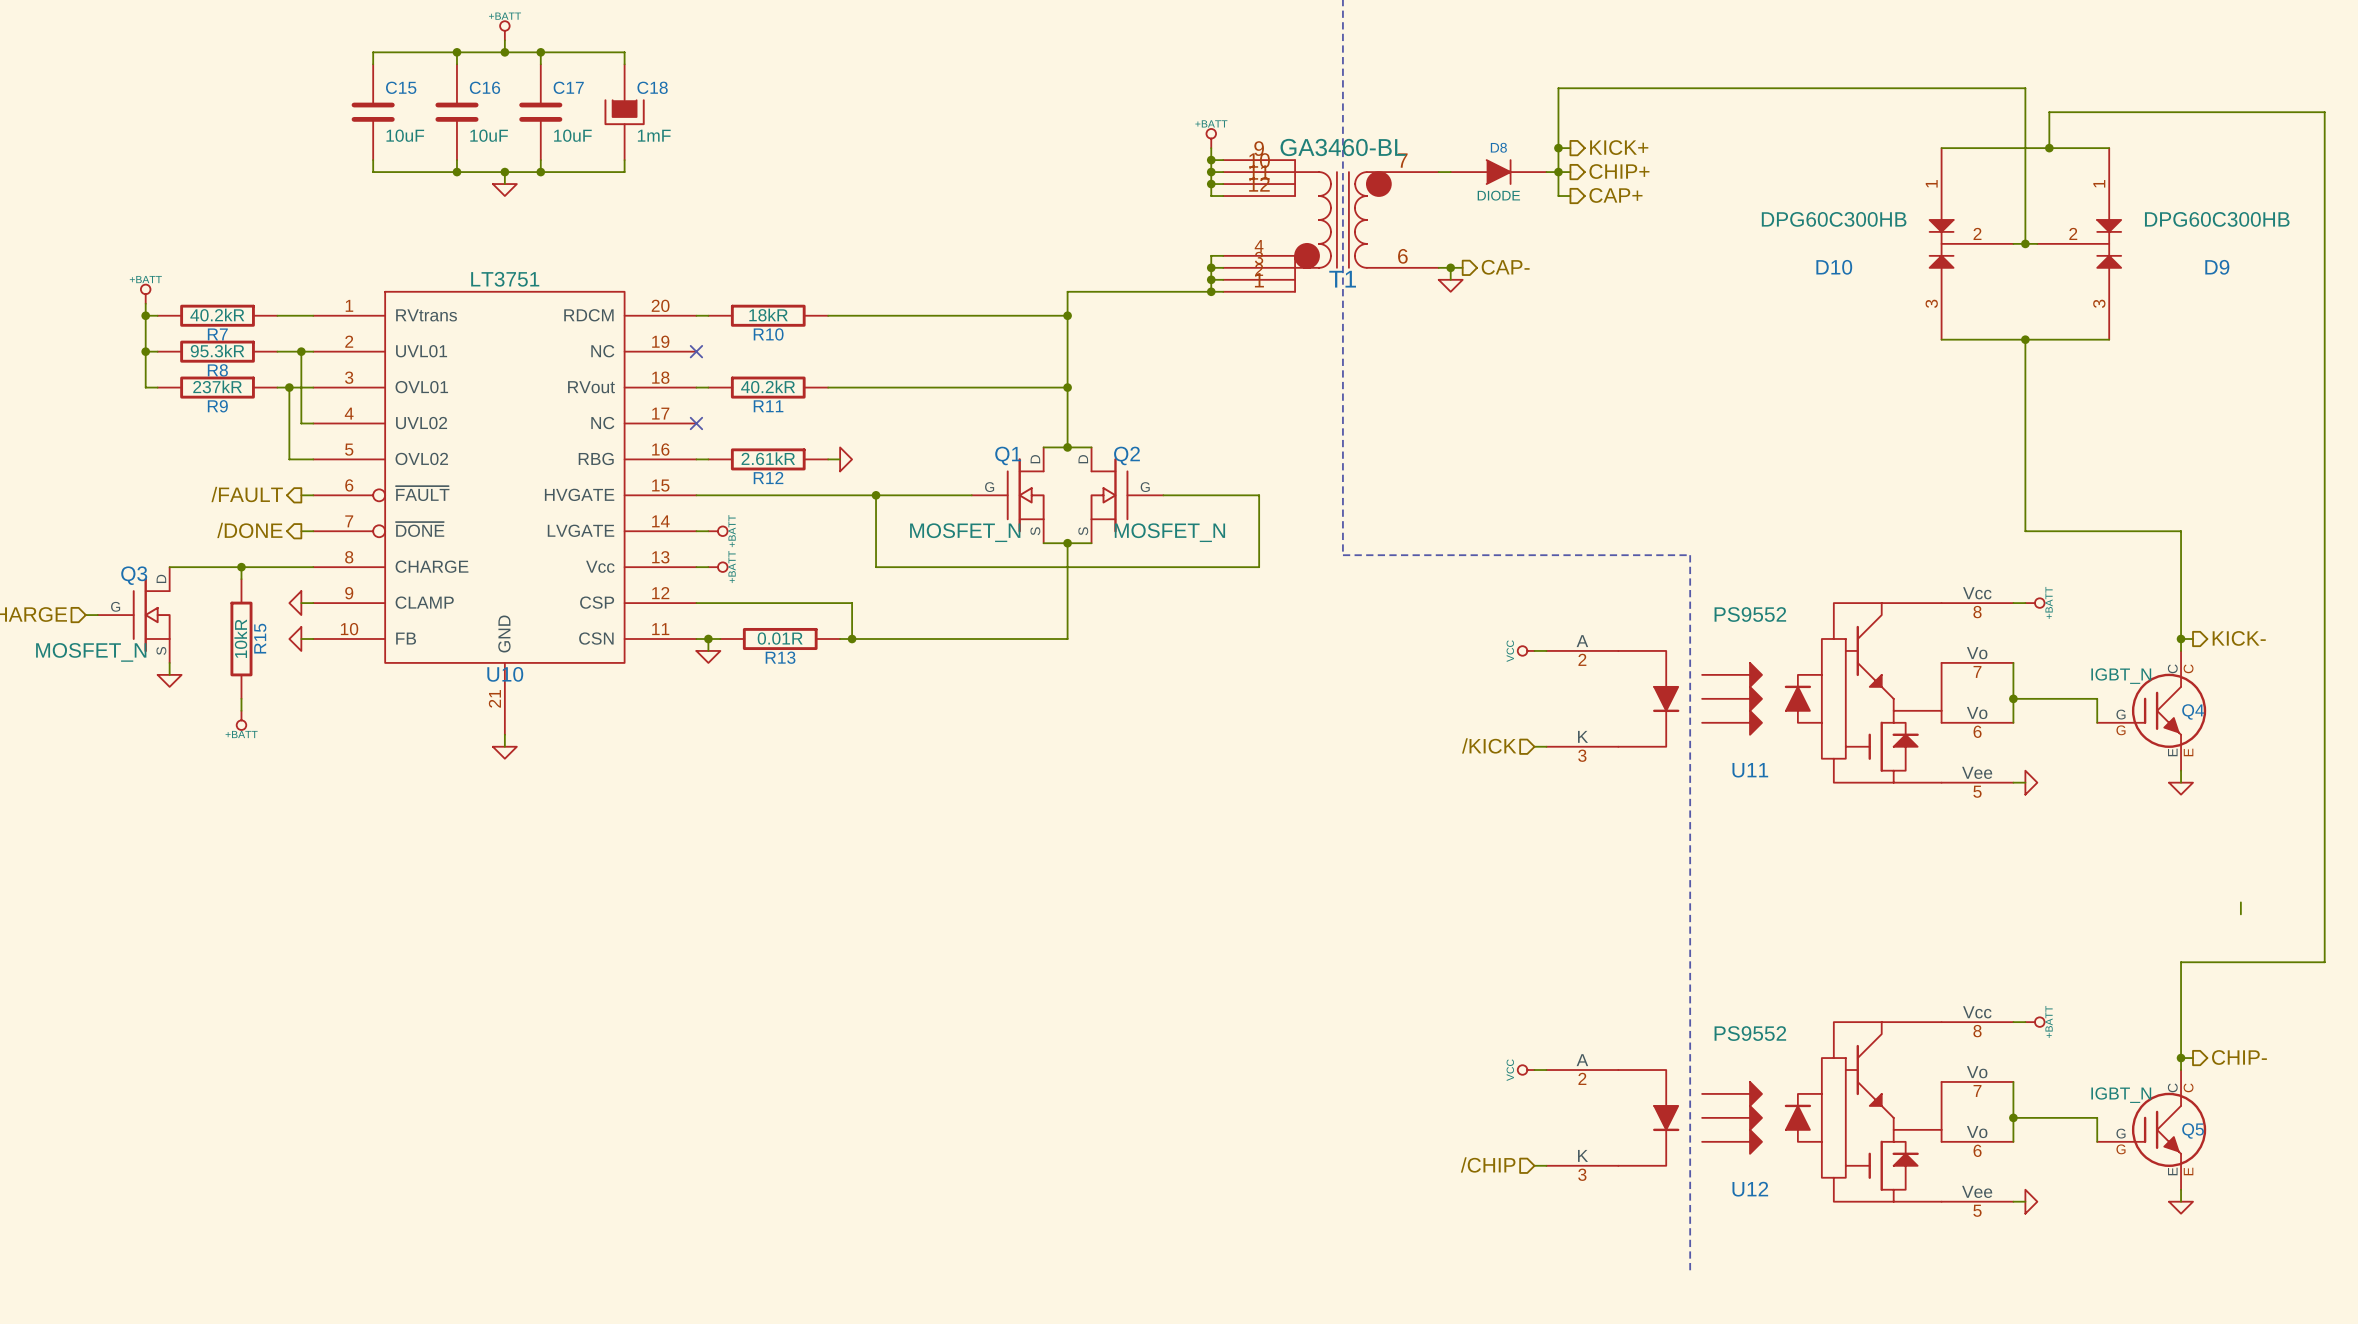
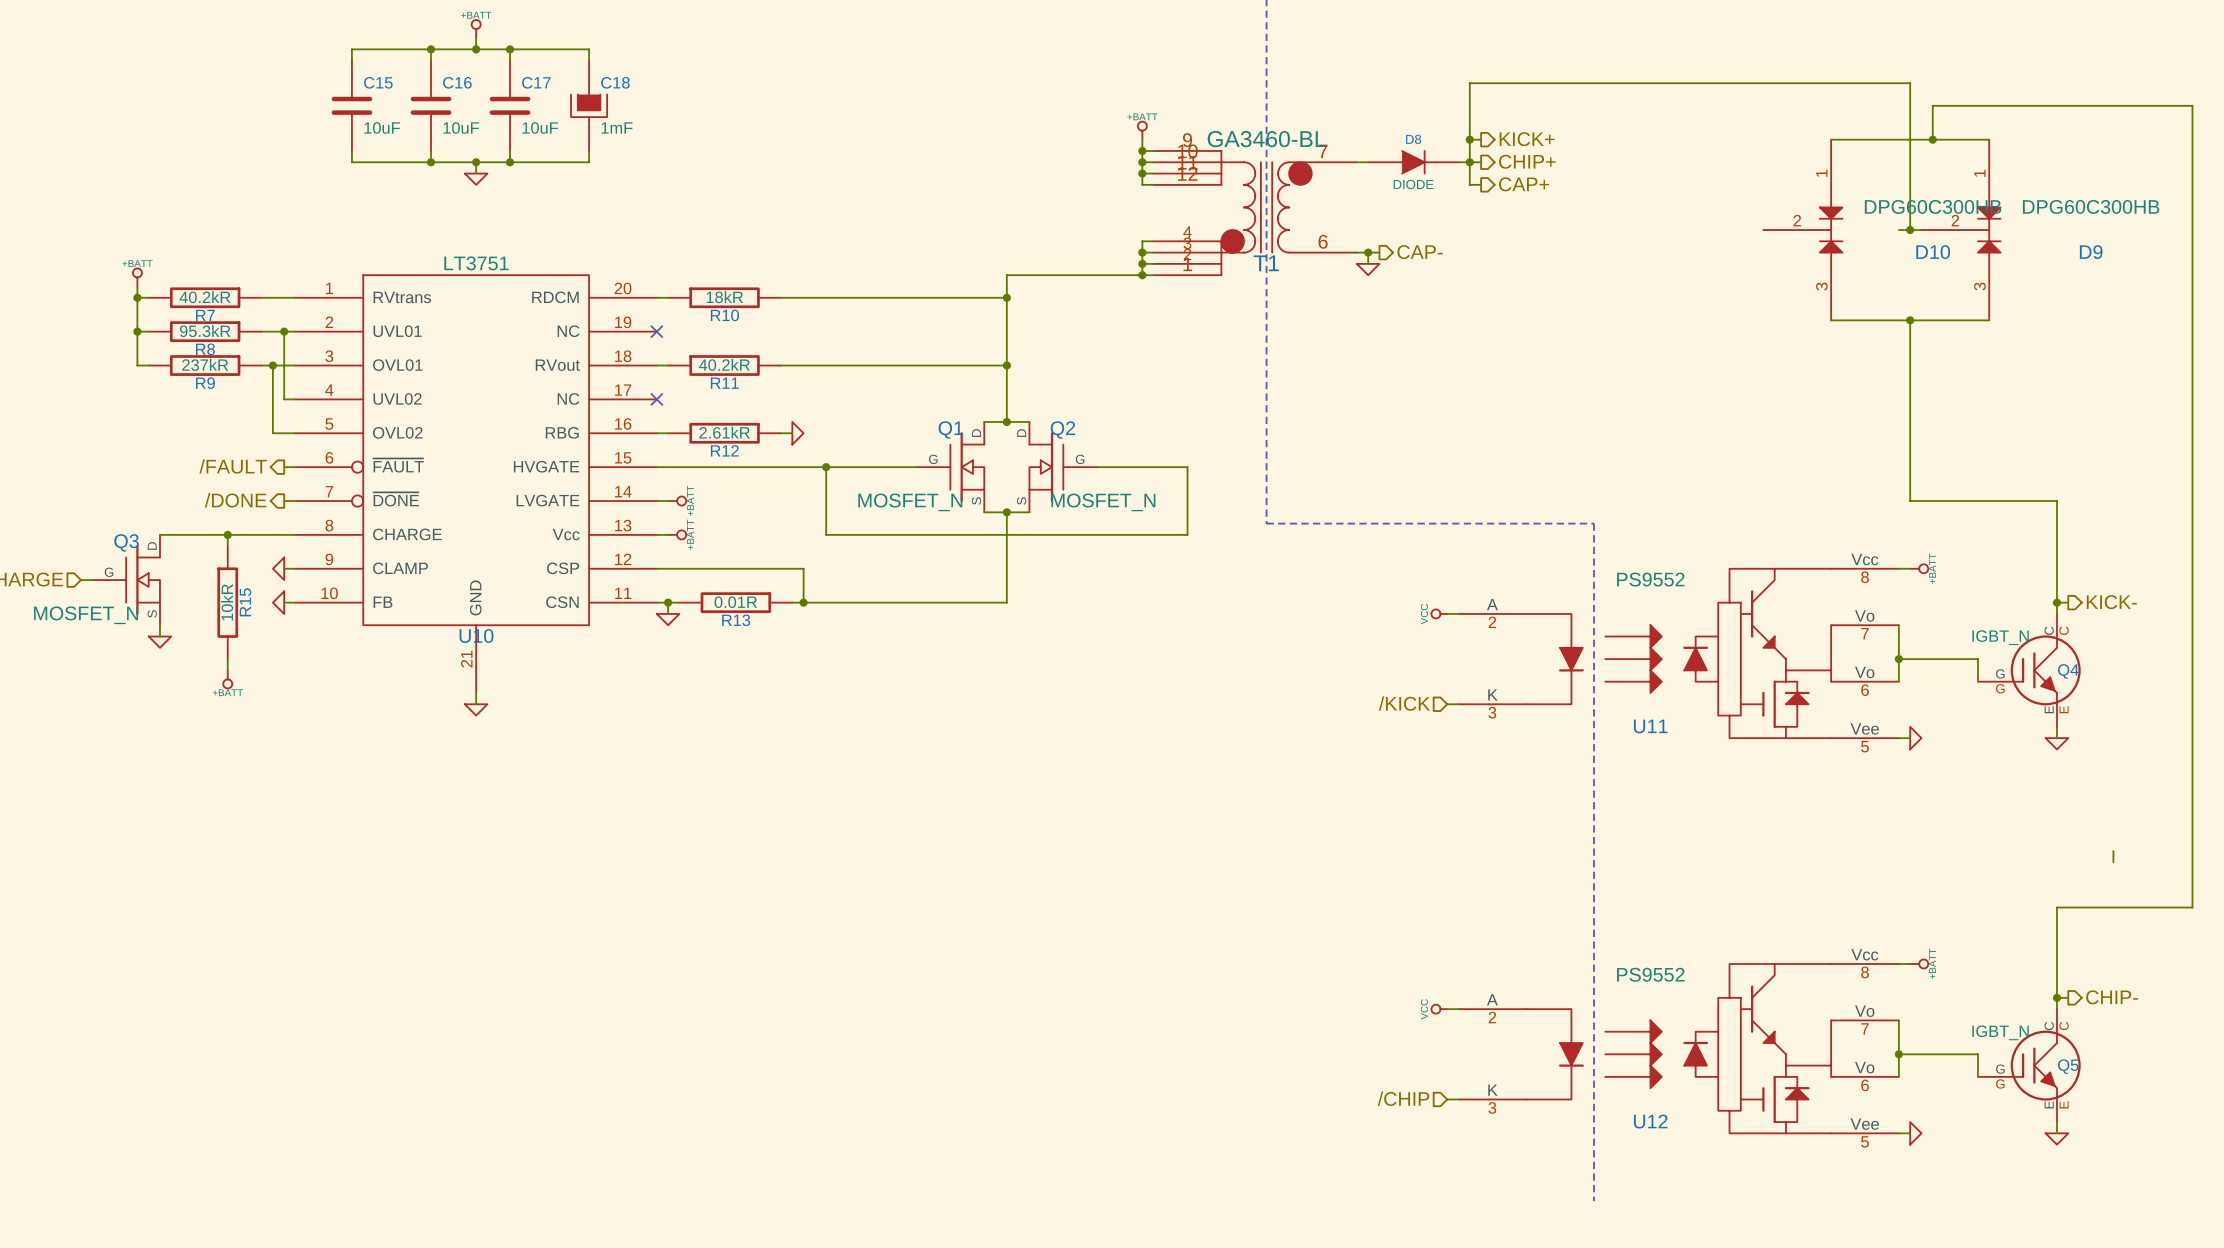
D10 flip: as is (1941, 243) -> left-right (1831, 230)

